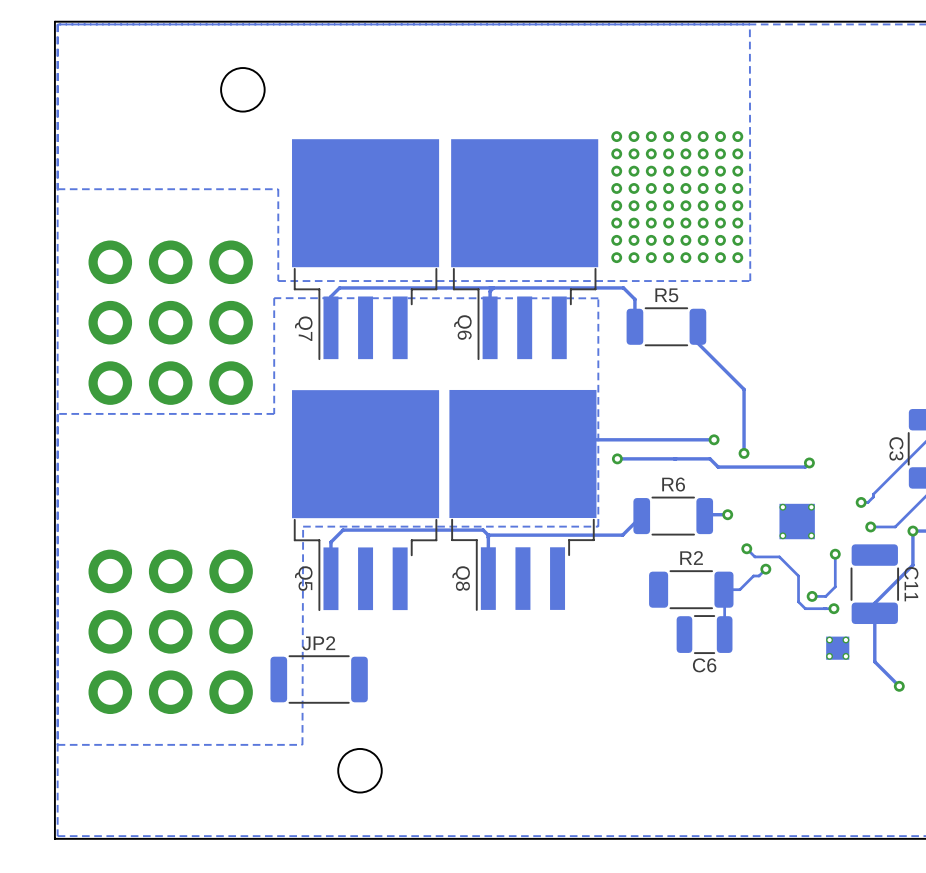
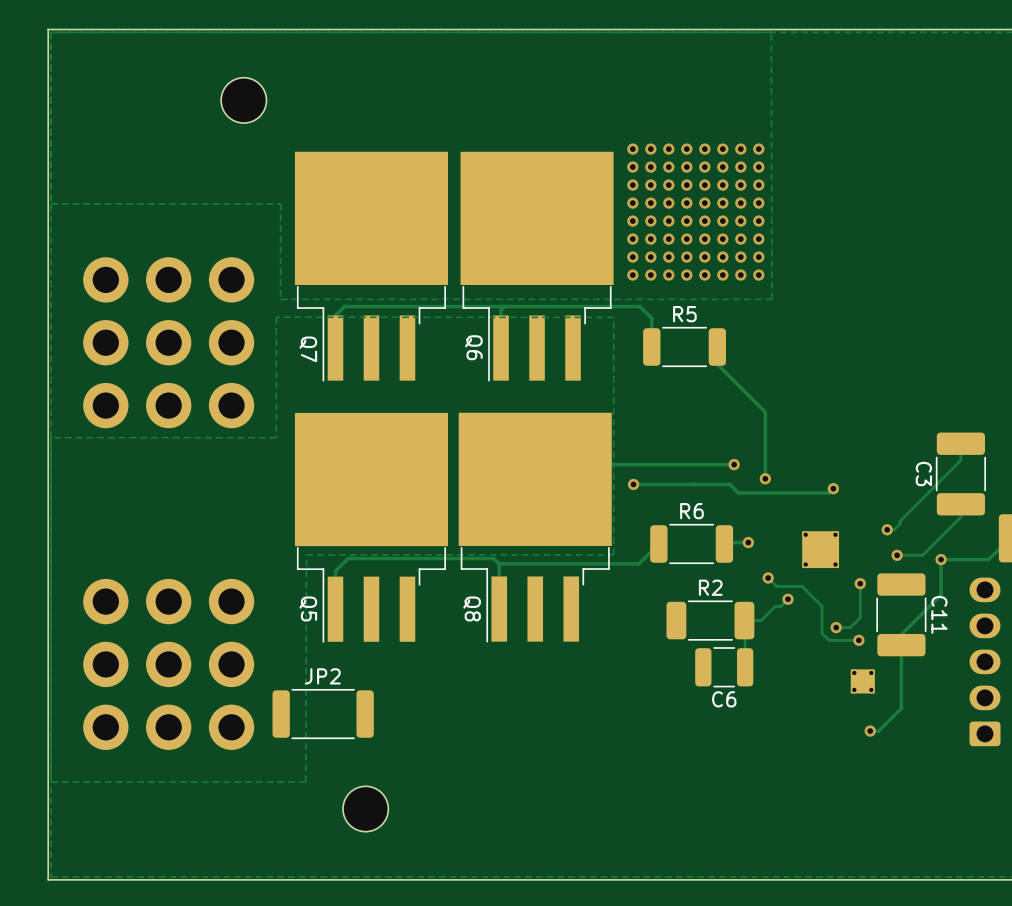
track: (874, 661) (899, 686) -> (901, 695) (901, 708) (878, 731) (870, 731)
via position: (899, 686) -> (870, 731)

